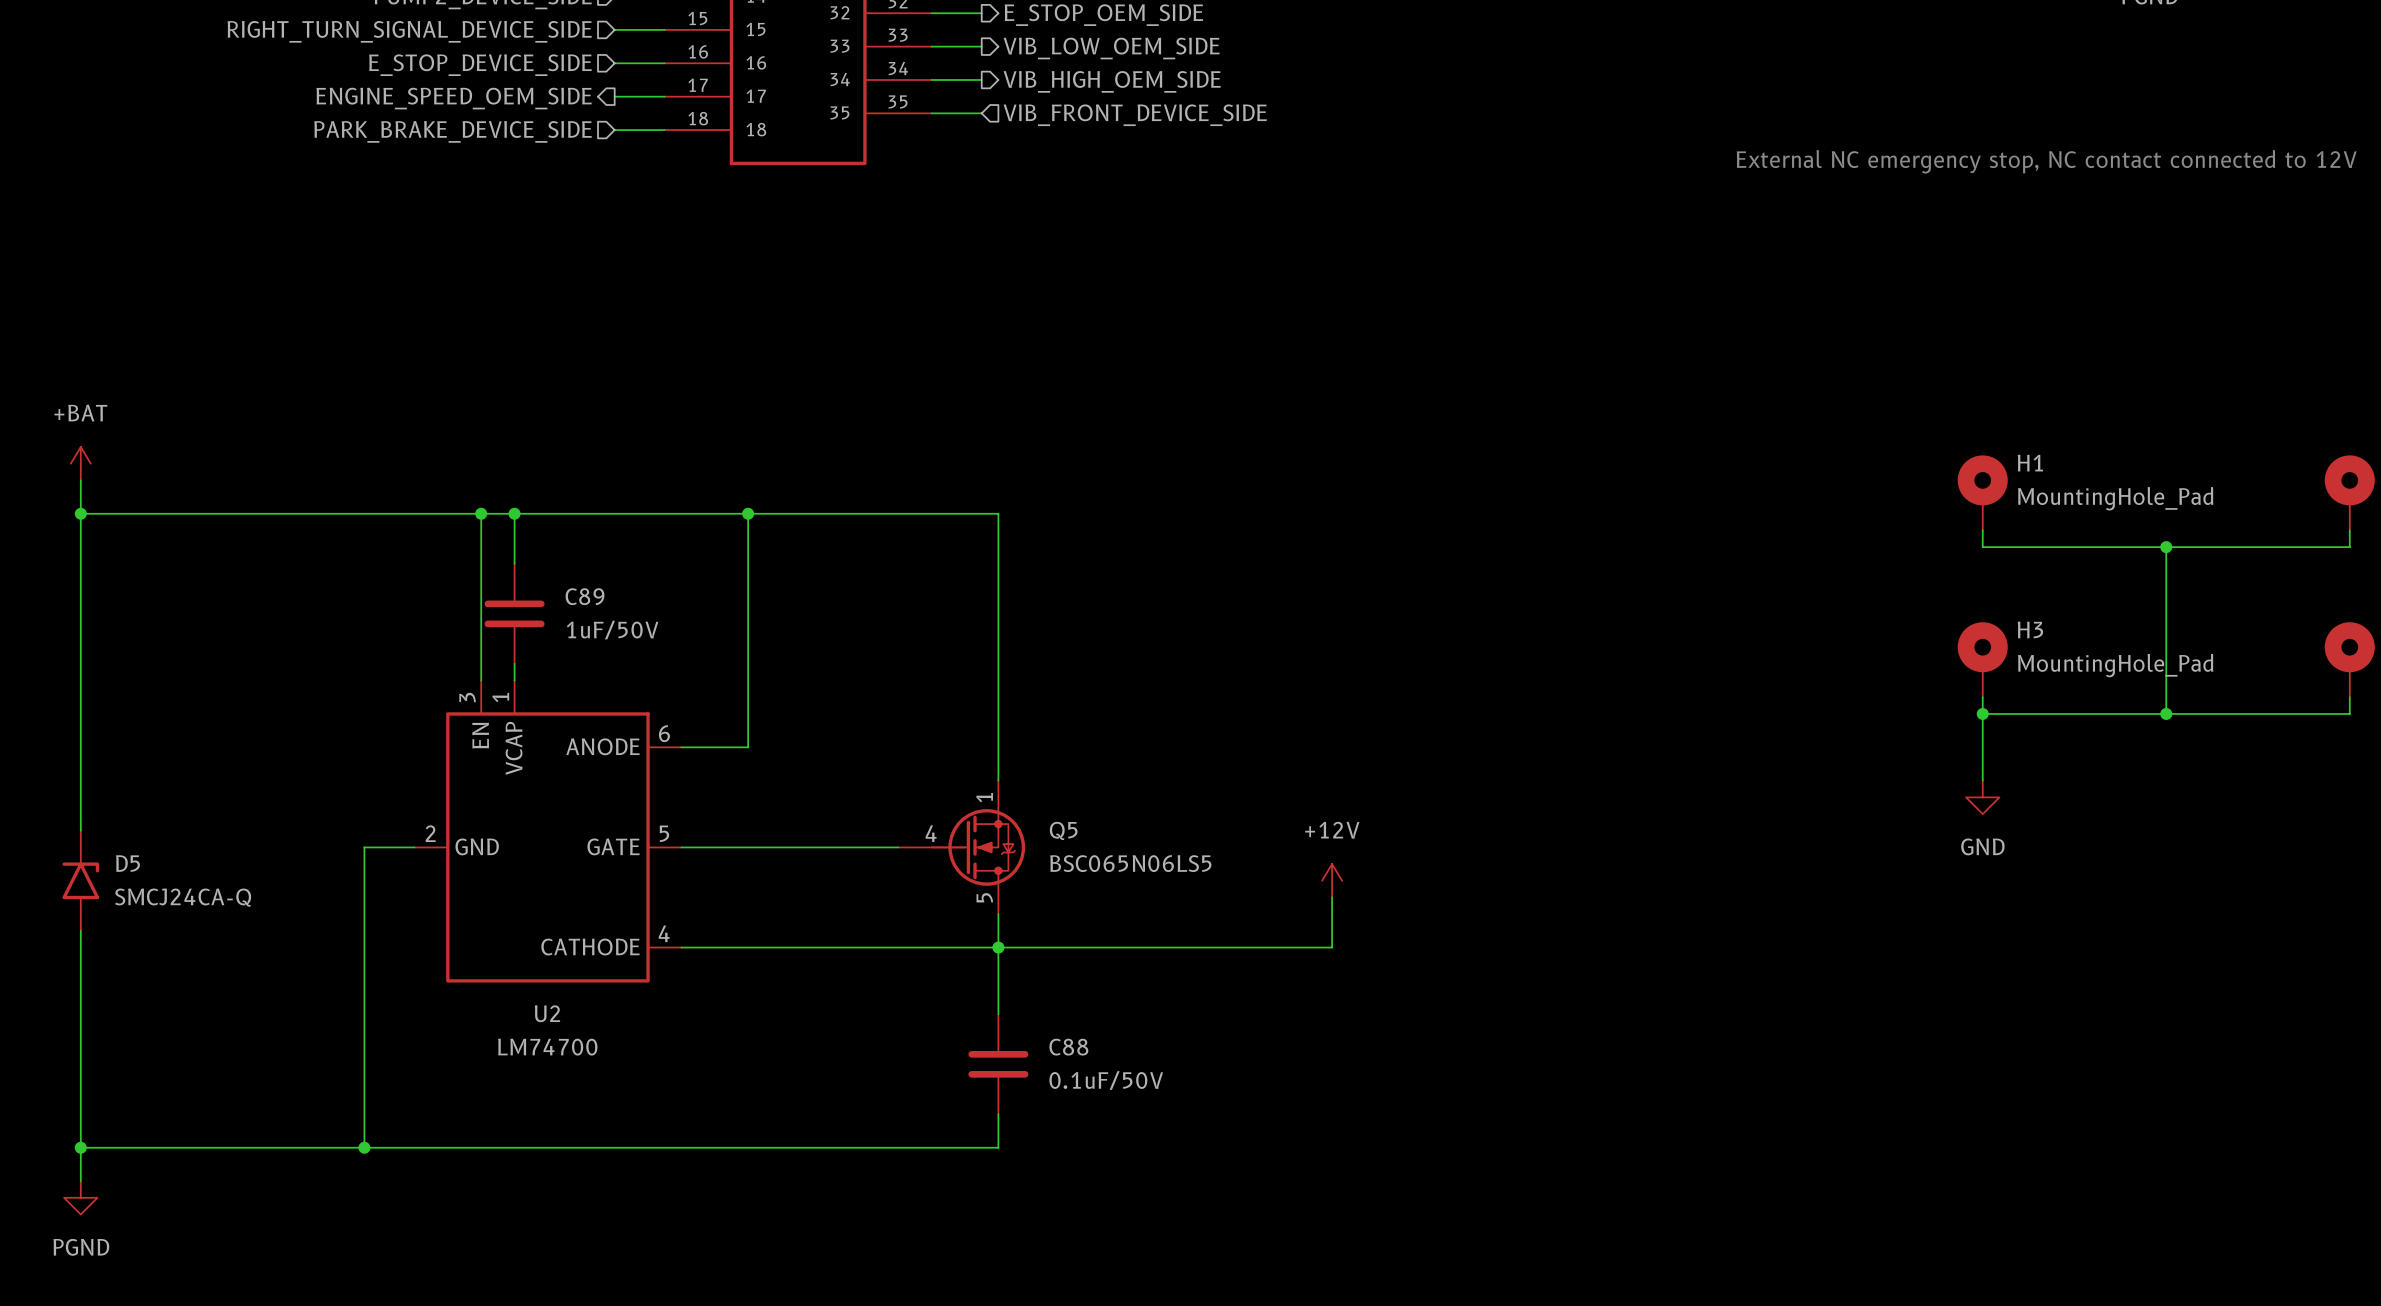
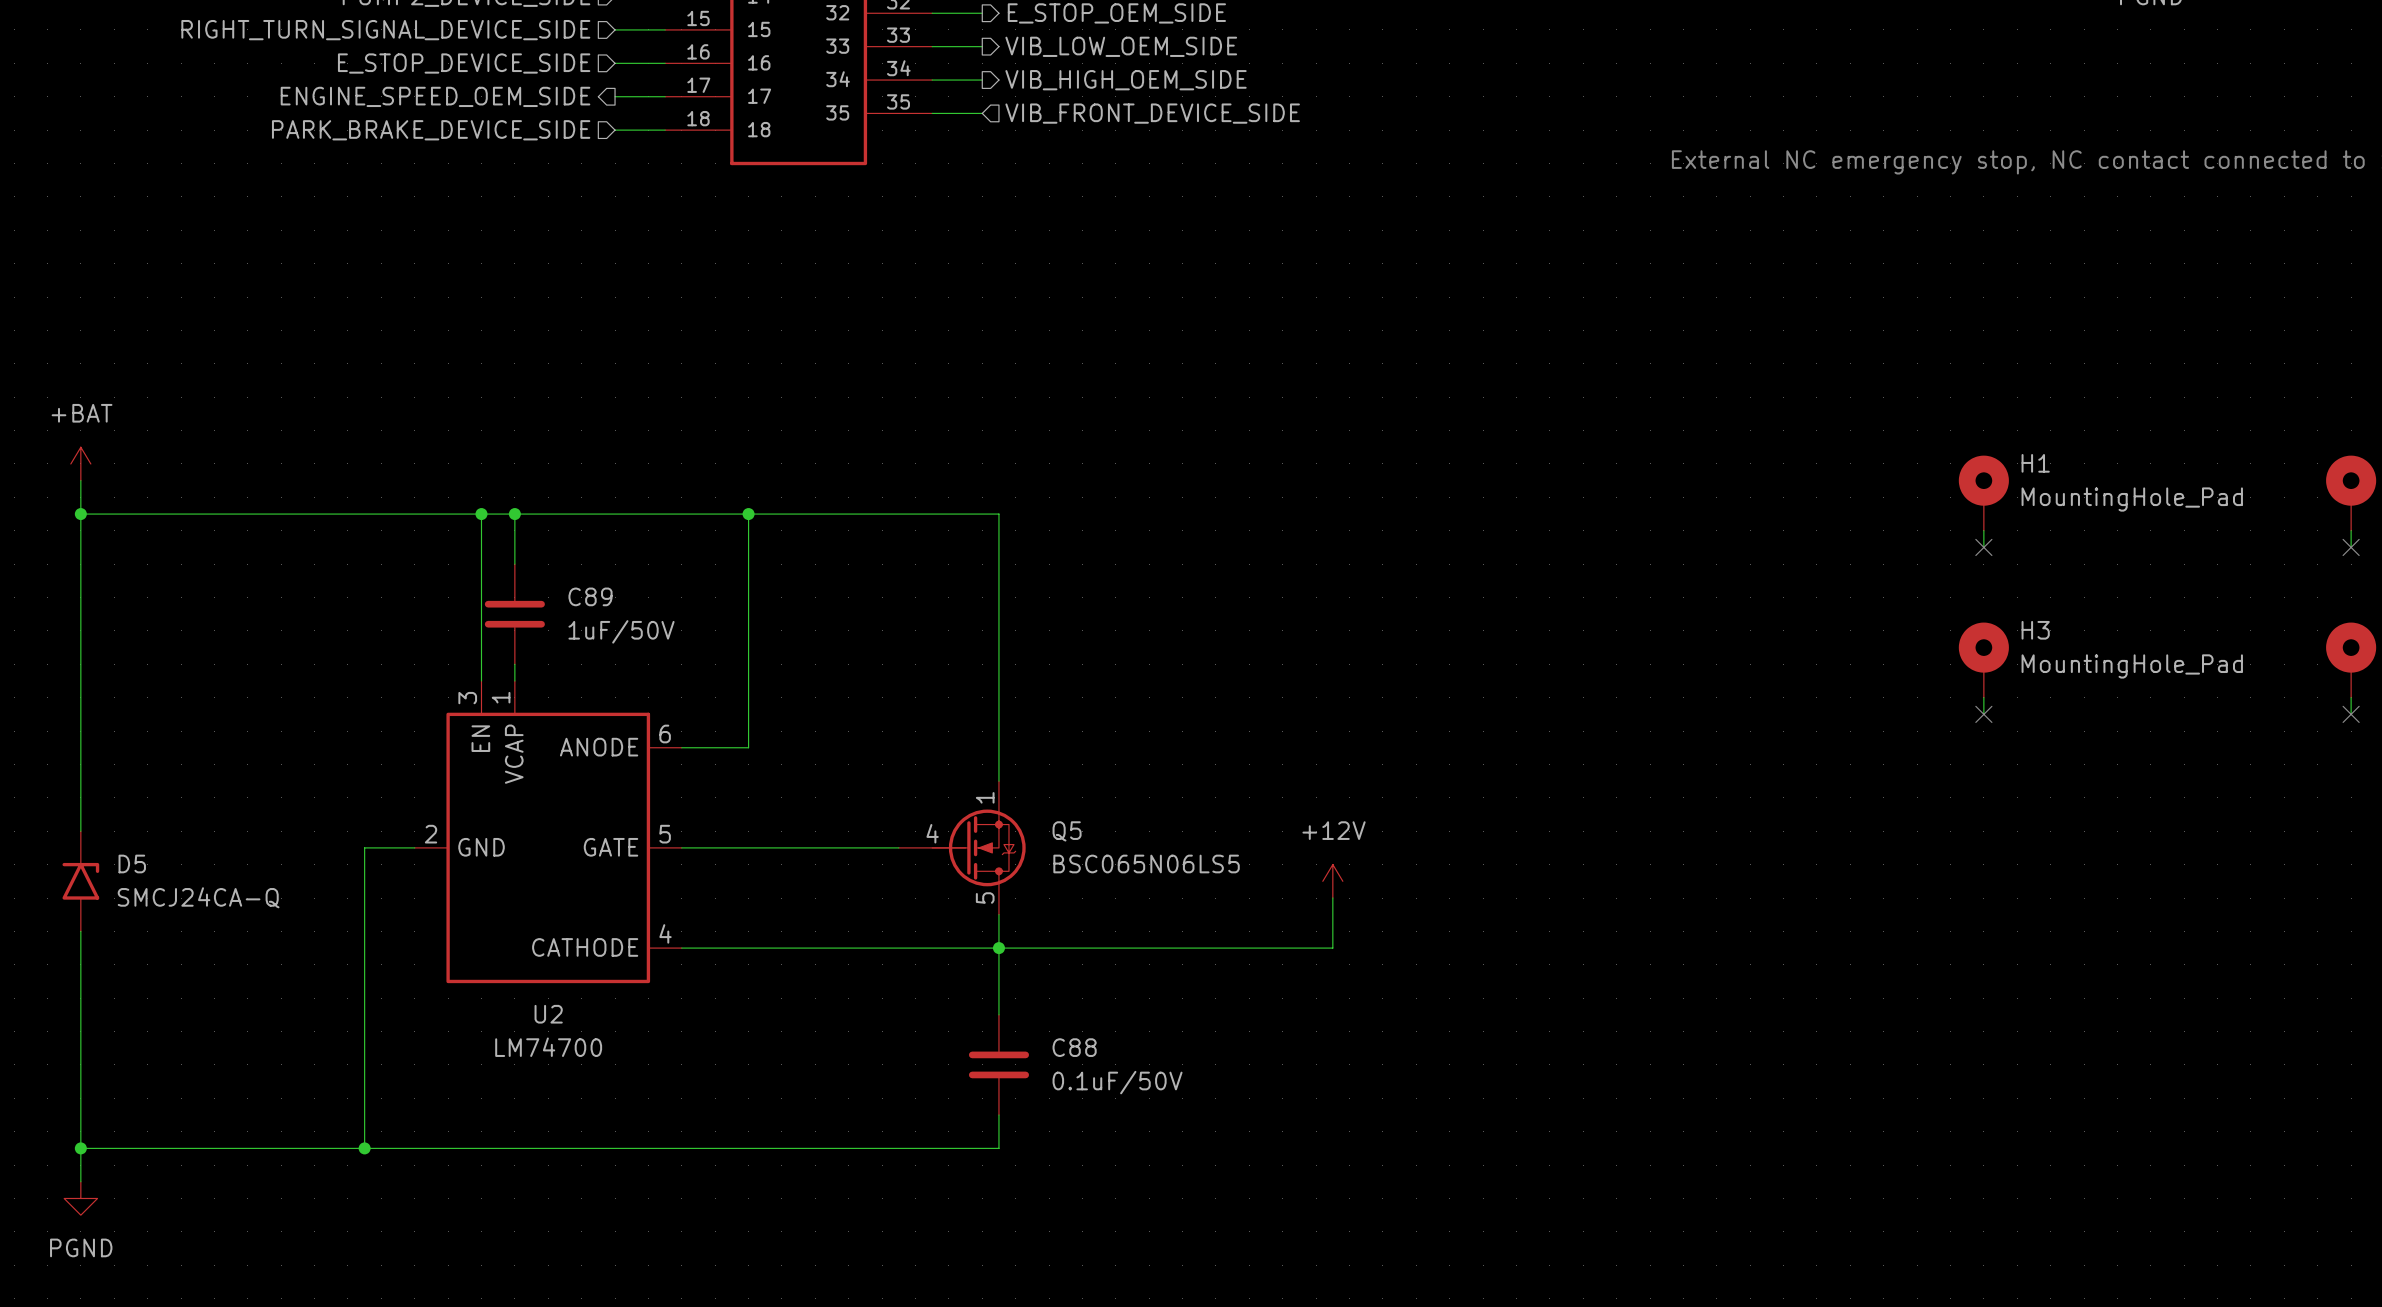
wire: (1982, 547) (2349, 547) -> none
no-connect mark: none -> (1983, 547)
wire: (2166, 547) (2166, 713) -> none
junction: (2166, 547) -> none
no-connect mark: none -> (2351, 547)
junction: (1982, 713) -> none
no-connect mark: none -> (1983, 714)
junction: (2166, 713) -> none
wire: (2349, 713) (1982, 713) (1982, 780) -> none
no-connect mark: none -> (2351, 714)
power symbol: GND (1982, 797) -> none

